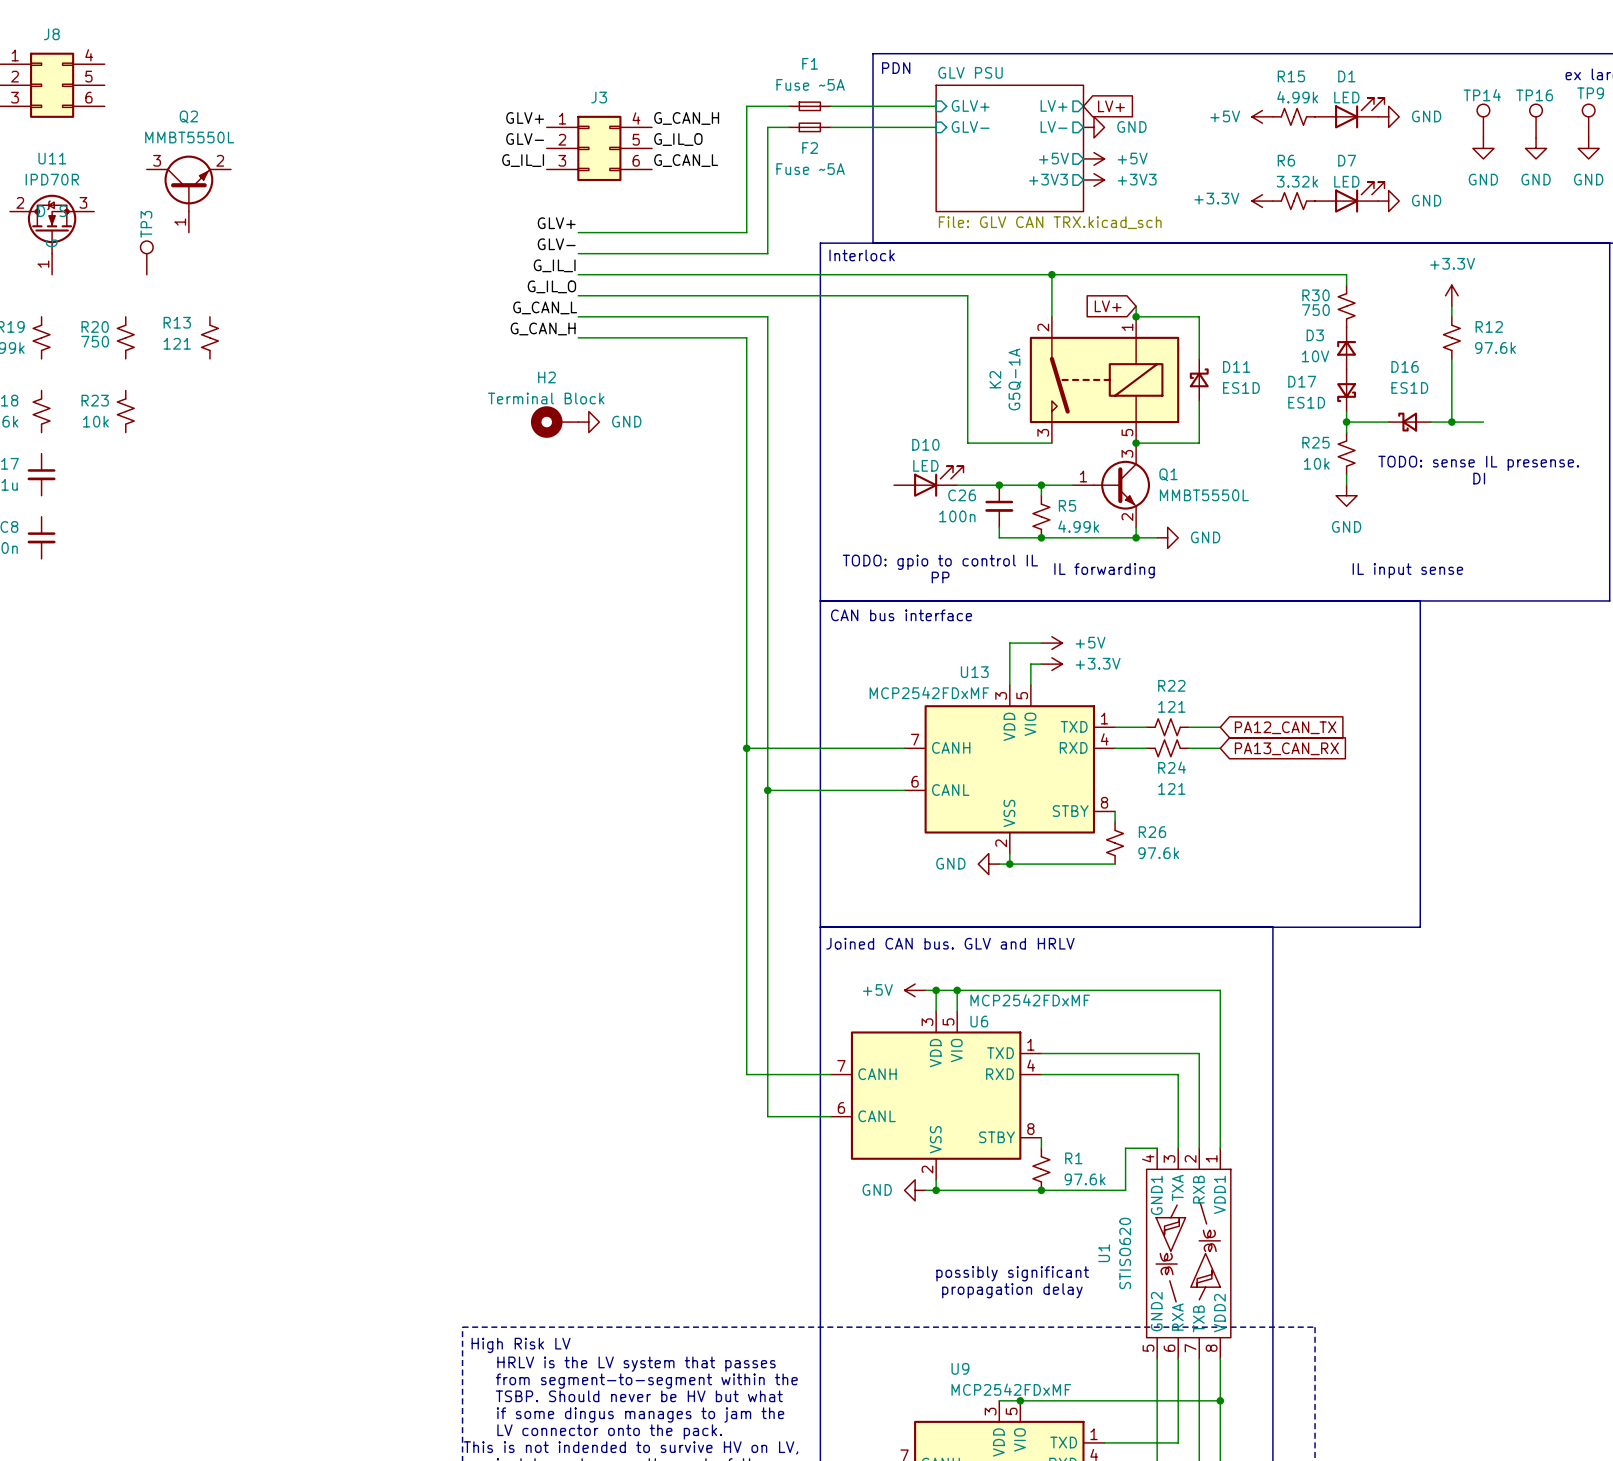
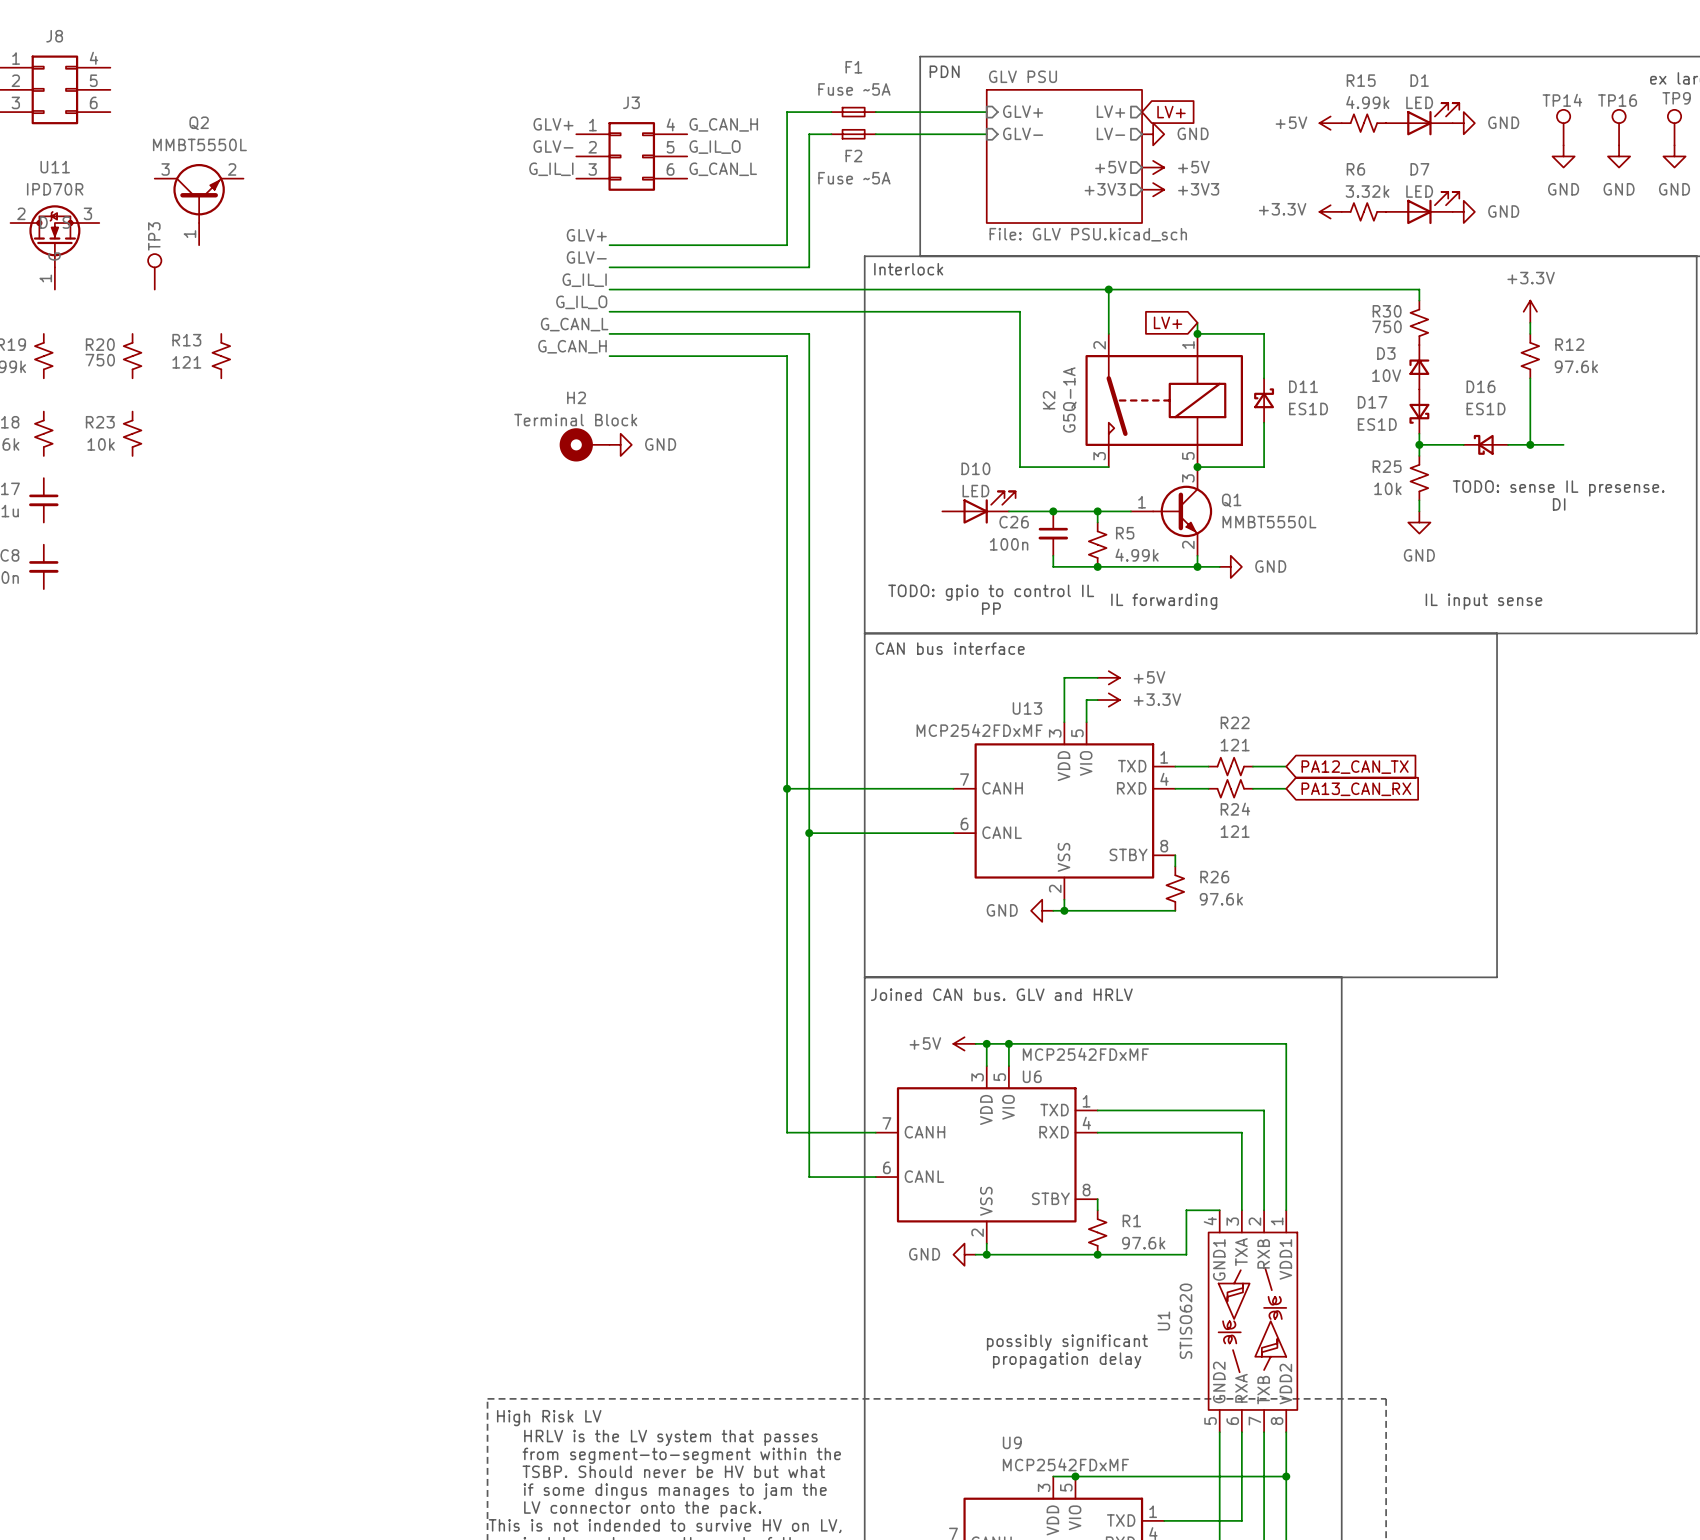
sheet GLV PSU value: File: GLV CAN TRX.kicad_sch (1050, 222) -> File: GLV PSU.kicad_sch (1088, 234)

